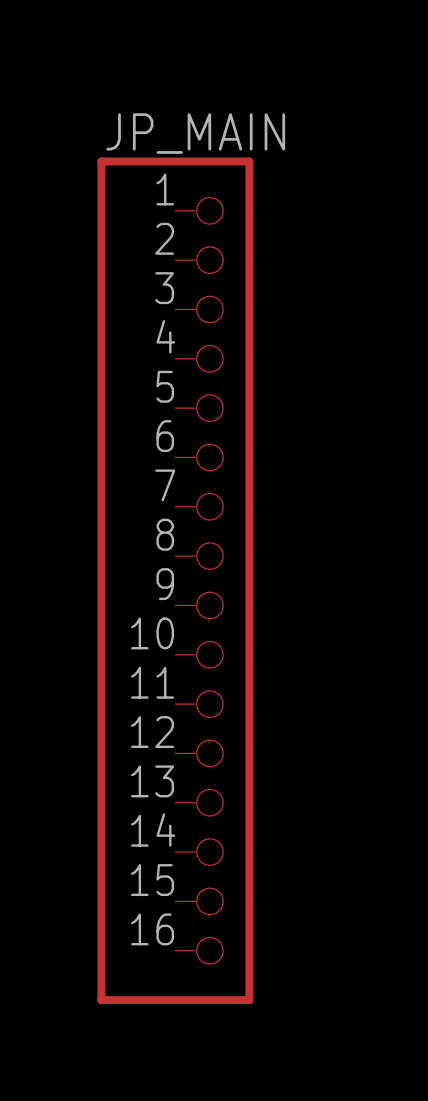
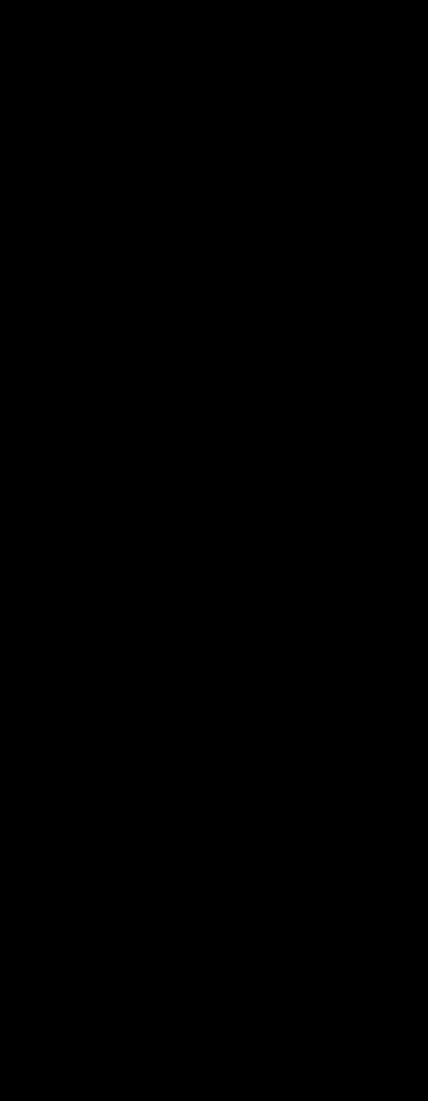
JP_MAIN: (175, 580) -> none

